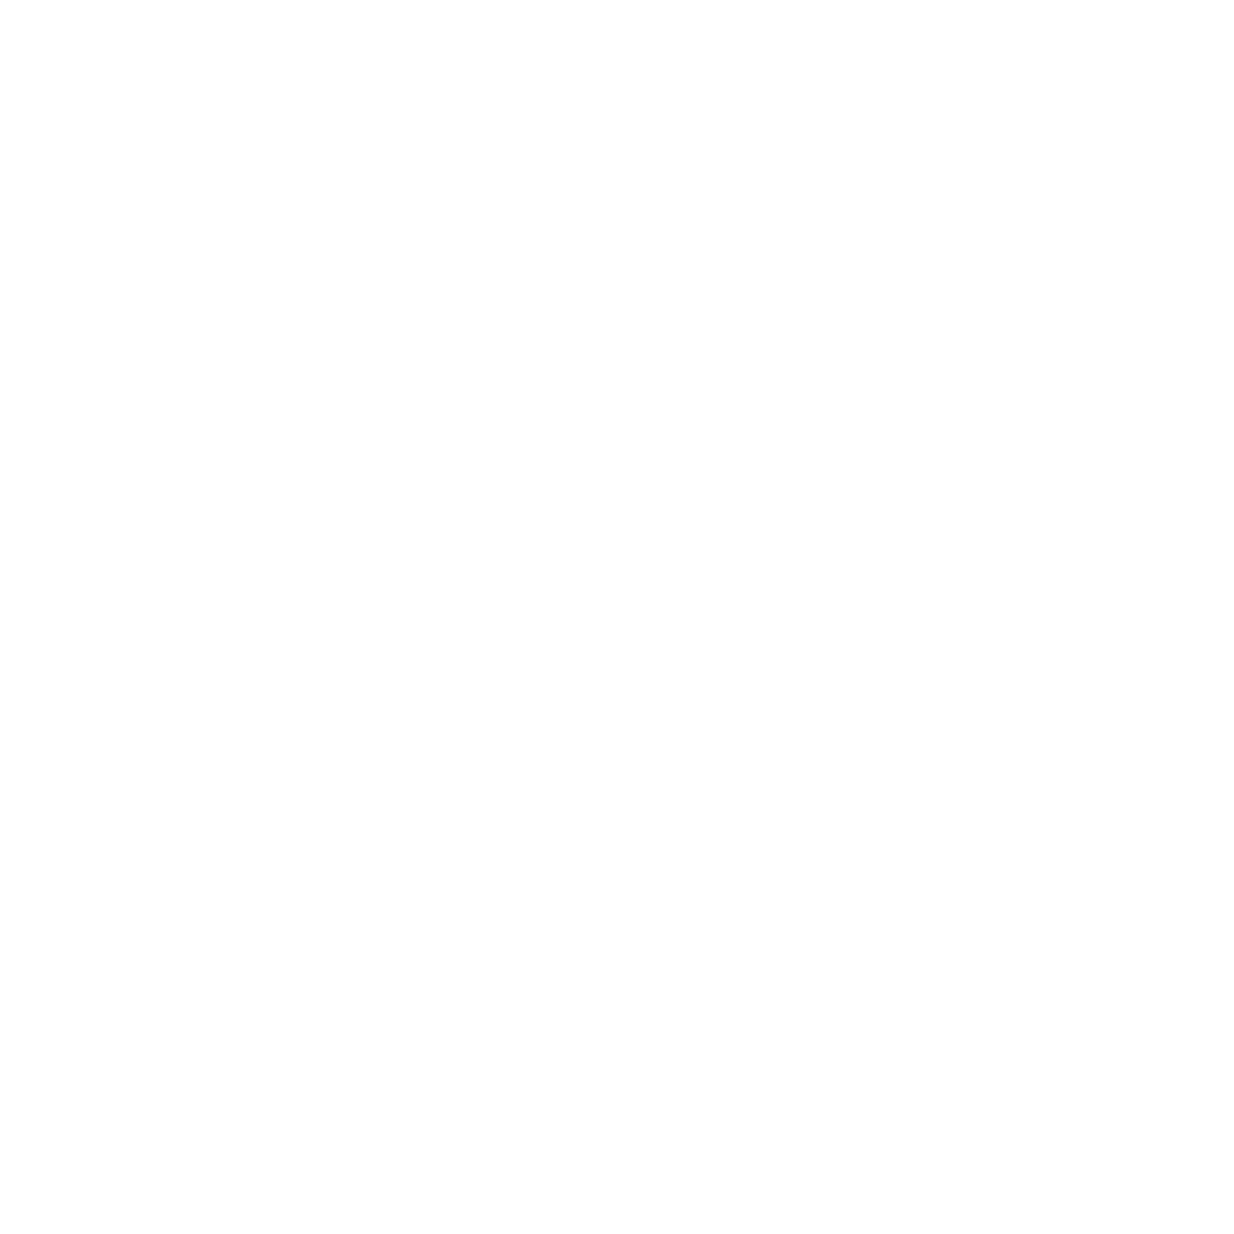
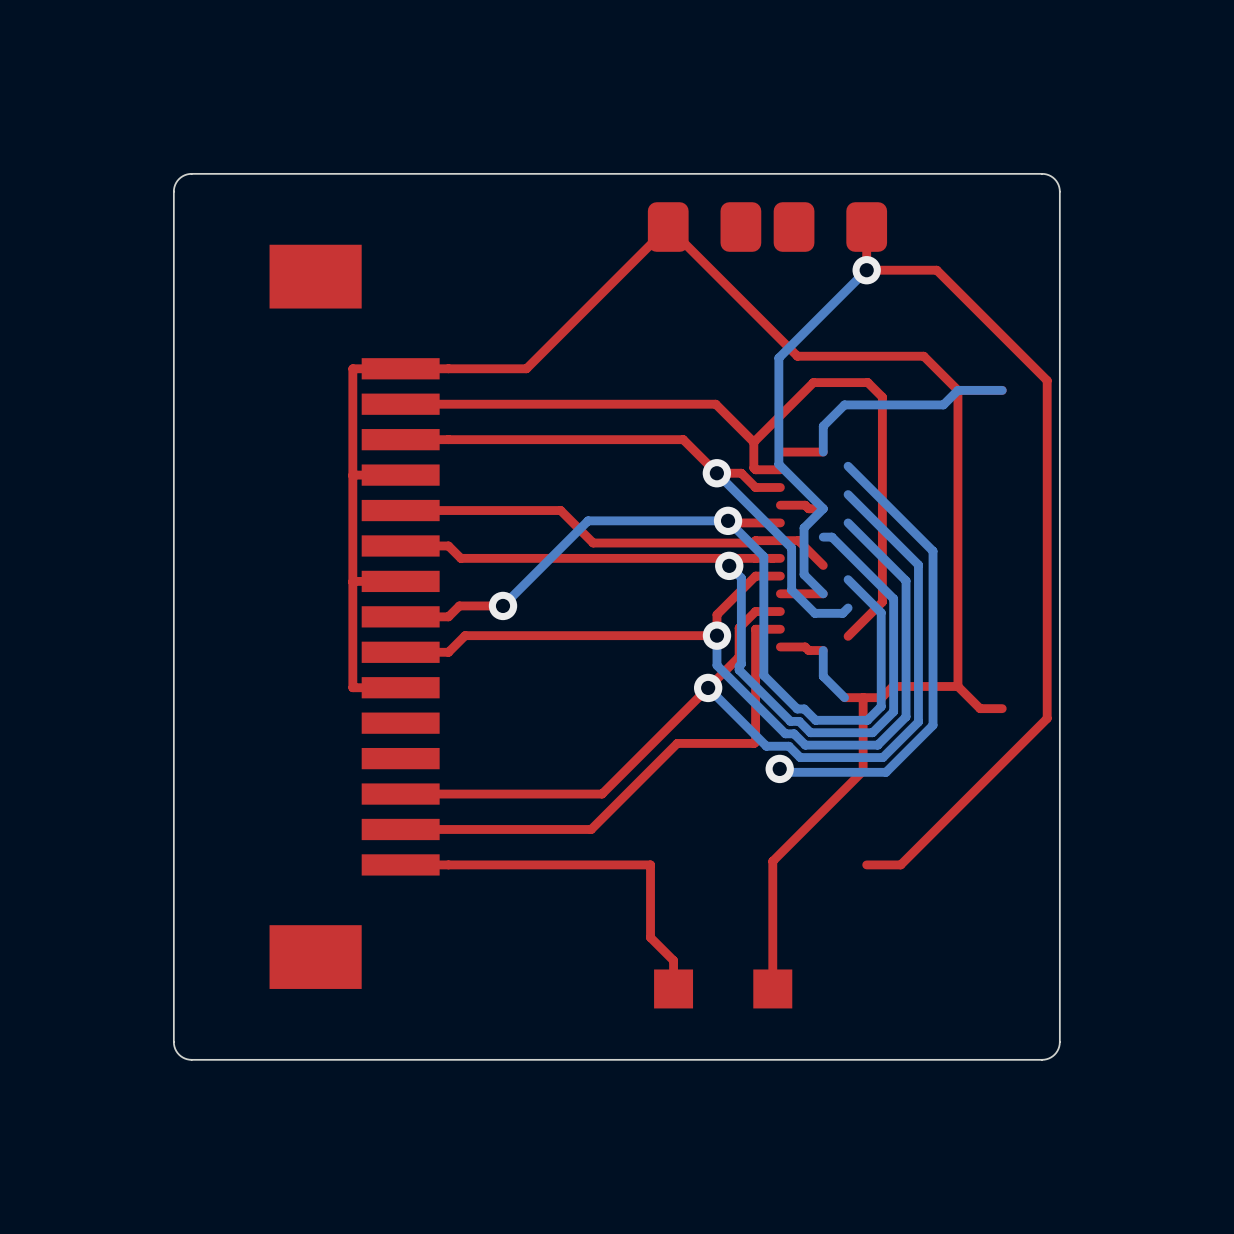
board edge: none -> (1042, 173) (191, 173) (179, 179) (173, 191) (173, 1042) (179, 1054) (191, 1059) (1042, 1059) (1054, 1054) (1059, 1042) (1059, 191) (1054, 179) (1042, 173)
part: none -> (704, 227)
part: none -> (830, 227)
top track: none -> (866, 227) (866, 270) (936, 270) (1047, 380) (1047, 718) (900, 864) (866, 864)
bottom track: none -> (866, 270) (778, 358) (778, 464) (823, 508) (804, 528) (804, 574) (823, 593)
via: none -> (866, 270)
top track: none -> (957, 390) (957, 686)
top track: none -> (957, 390) (923, 356) (797, 356) (668, 227) (526, 368) (352, 368) (352, 475) (400, 475)
bottom track: none -> (1002, 390) (957, 390) (943, 404) (844, 404) (823, 426) (823, 452)
top track: none -> (400, 404) (715, 404) (753, 442)
top track: none -> (400, 439) (683, 439) (716, 473) (741, 473) (755, 487) (780, 487)
top track: none -> (753, 442) (753, 468) (755, 469) (780, 469)
top track: none -> (753, 442) (813, 382) (867, 382) (882, 397) (882, 602) (848, 636)
top track: none -> (823, 452) (780, 452)
bottom track: none -> (848, 466) (933, 551) (933, 725) (885, 772) (783, 772) (779, 768)
bottom track: none -> (716, 473) (791, 547) (791, 590) (814, 613) (842, 613) (848, 607)
via: none -> (716, 473)
top track: none -> (353, 475) (352, 581) (400, 581)
bottom track: none -> (848, 494) (918, 564) (918, 721) (882, 757) (800, 757) (788, 746) (766, 746) (708, 687)
top track: none -> (780, 505) (805, 505) (808, 508) (823, 508)
top track: none -> (400, 510) (560, 510) (593, 543) (753, 543) (755, 540) (798, 540) (823, 565)
top track: none -> (728, 520) (730, 522) (780, 522)
via: none -> (728, 520)
bottom track: none -> (848, 522) (906, 580) (906, 716) (877, 745) (805, 745) (794, 733) (785, 733) (716, 665) (716, 635)
bottom track: none -> (823, 537) (831, 537) (893, 598) (893, 711) (872, 732) (810, 732) (799, 721) (790, 721) (739, 669) (741, 664) (741, 578) (729, 565)
top track: none -> (400, 545) (448, 545) (460, 558) (780, 558)
via: none -> (729, 565)
top track: none -> (780, 576) (755, 576) (716, 614) (716, 635) (465, 635) (448, 652) (400, 652)
bottom track: none -> (848, 579) (881, 612) (881, 706) (867, 720) (815, 720) (804, 708) (797, 708) (763, 675) (763, 556) (728, 520) (588, 520) (503, 605)
top track: none -> (353, 581) (352, 687) (400, 687)
top track: none -> (823, 593) (780, 593)
top track: none -> (503, 605) (459, 605) (448, 616) (400, 616)
via: none -> (503, 605)
top track: none -> (780, 611) (755, 611) (739, 627) (739, 656) (602, 794) (400, 794)
part: none -> (354, 616)
top track: none -> (780, 629) (755, 629) (755, 742) (677, 743) (591, 829) (400, 829)
via: none -> (716, 635)
top track: none -> (780, 646) (805, 646) (808, 650) (823, 650)
bottom track: none -> (823, 650) (823, 676) (844, 697)
top track: none -> (957, 686) (980, 708) (1002, 708)
top track: none -> (957, 686) (892, 686) (881, 697) (844, 697)
via: none -> (708, 687)
top track: none -> (863, 697) (863, 770) (772, 861) (772, 988)
via: none -> (779, 768)
top track: none -> (400, 864) (650, 864) (650, 937) (673, 960) (673, 988)
part: none -> (723, 988)

